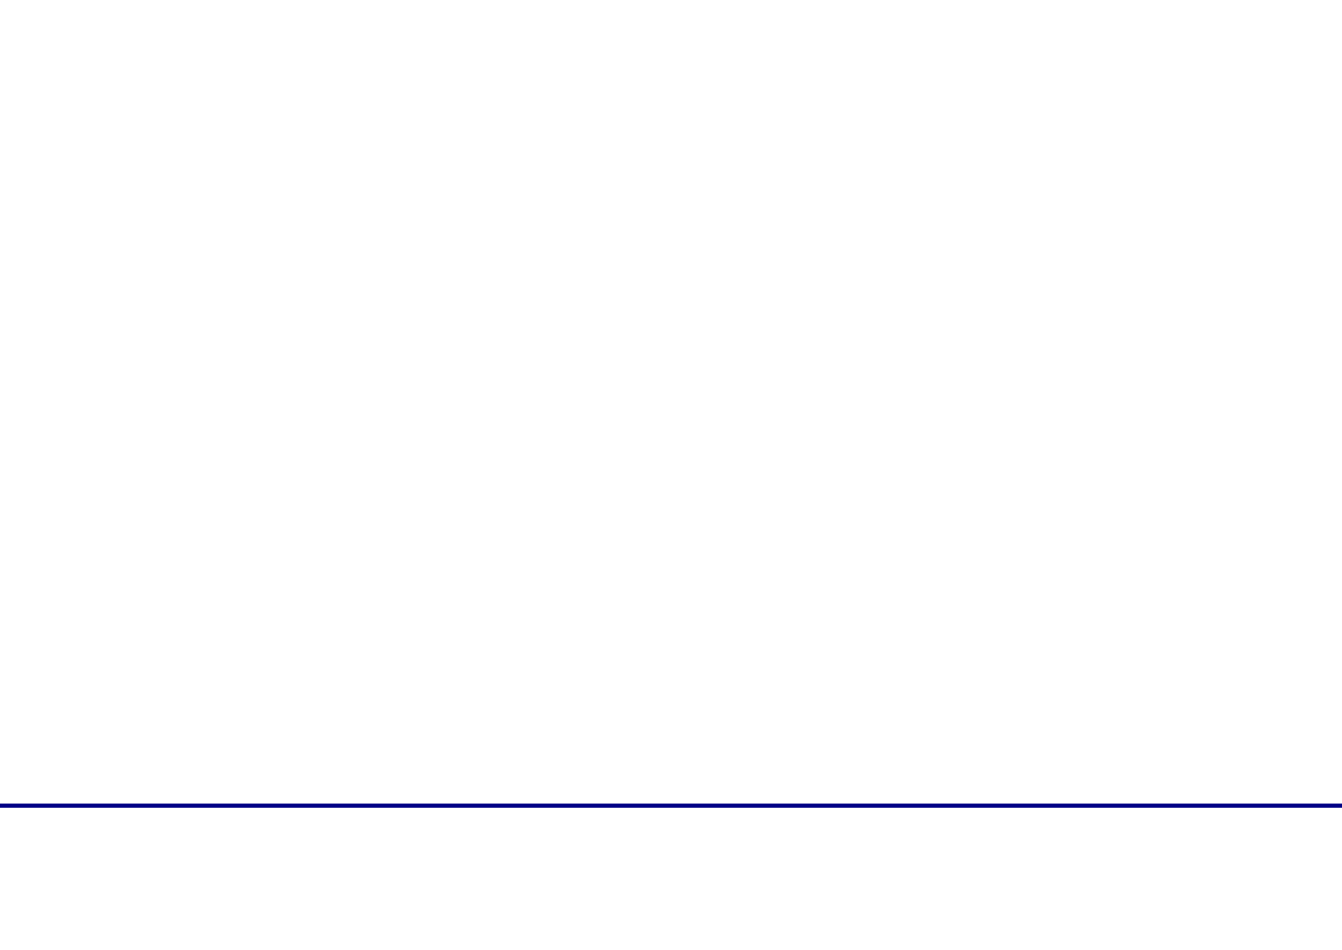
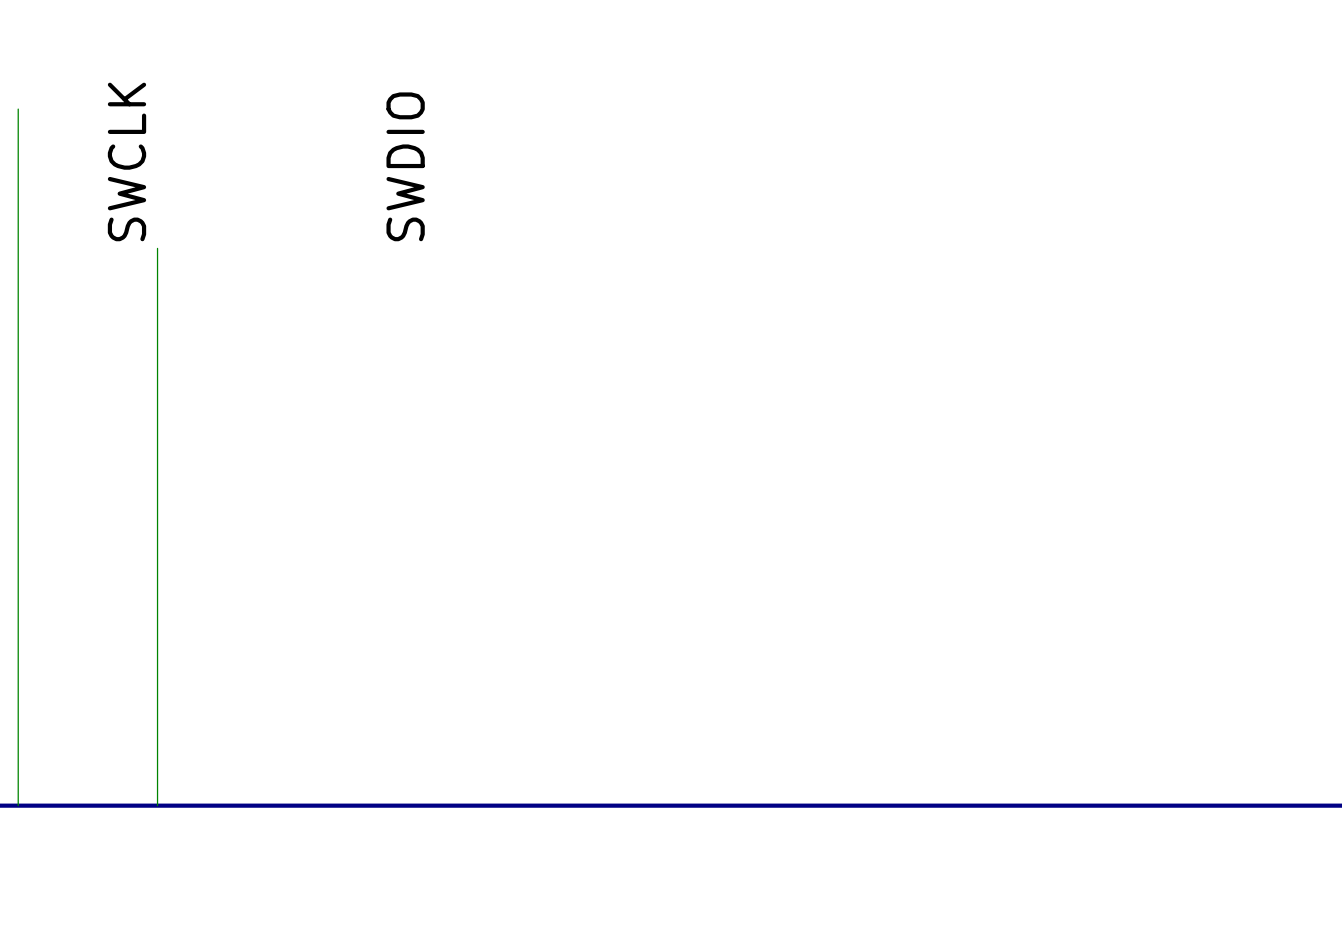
wire: none -> (18, 109) (18, 805)
label: none -> SWCLK (126, 161)
label: none -> SWDIO (405, 166)
wire: none -> (157, 248) (157, 805)

